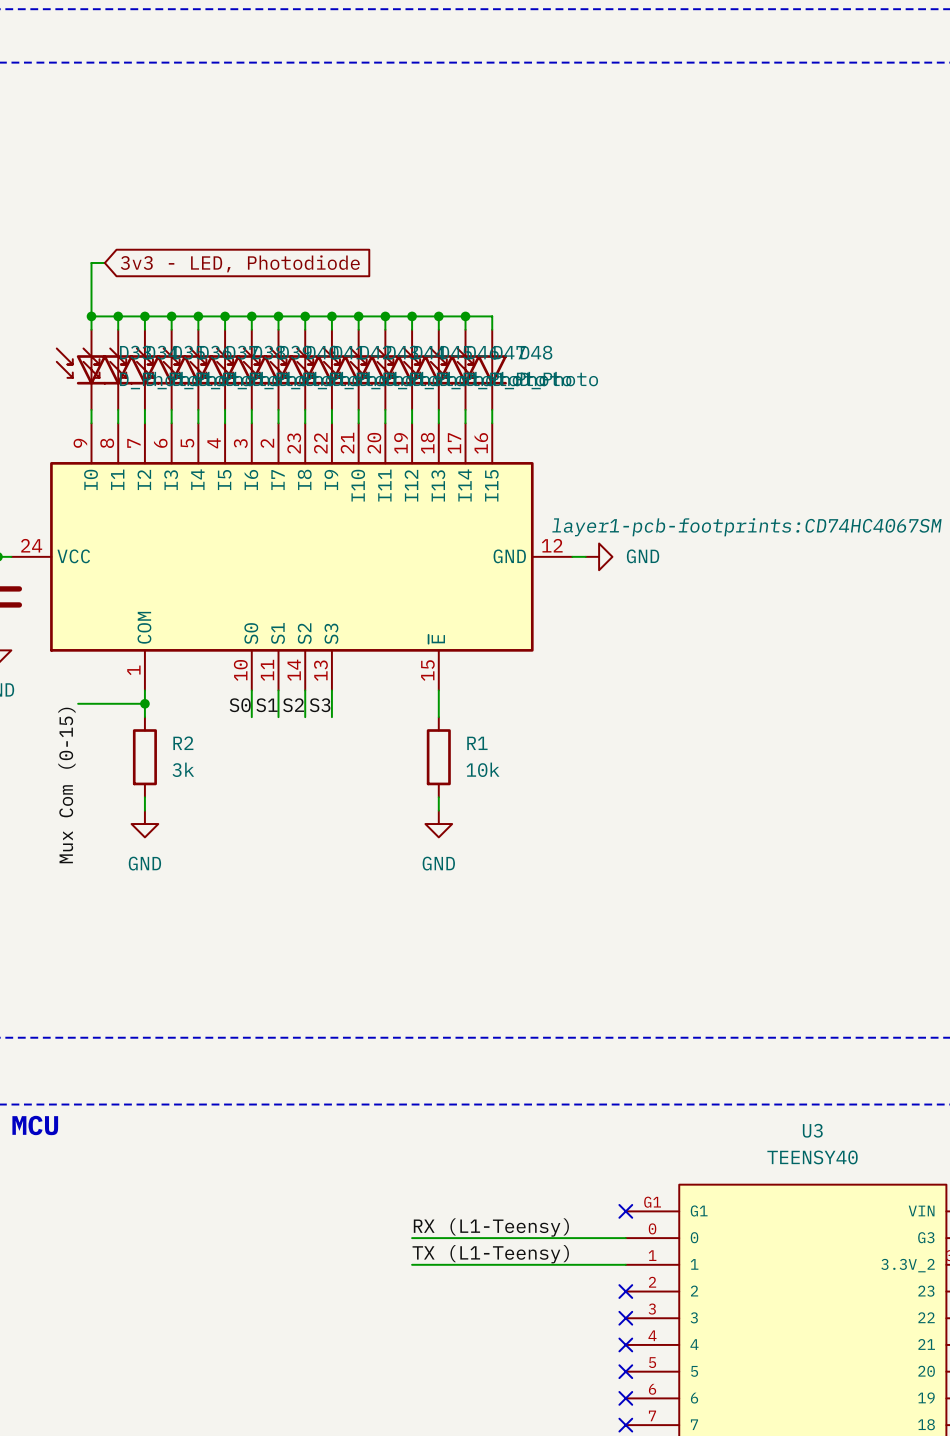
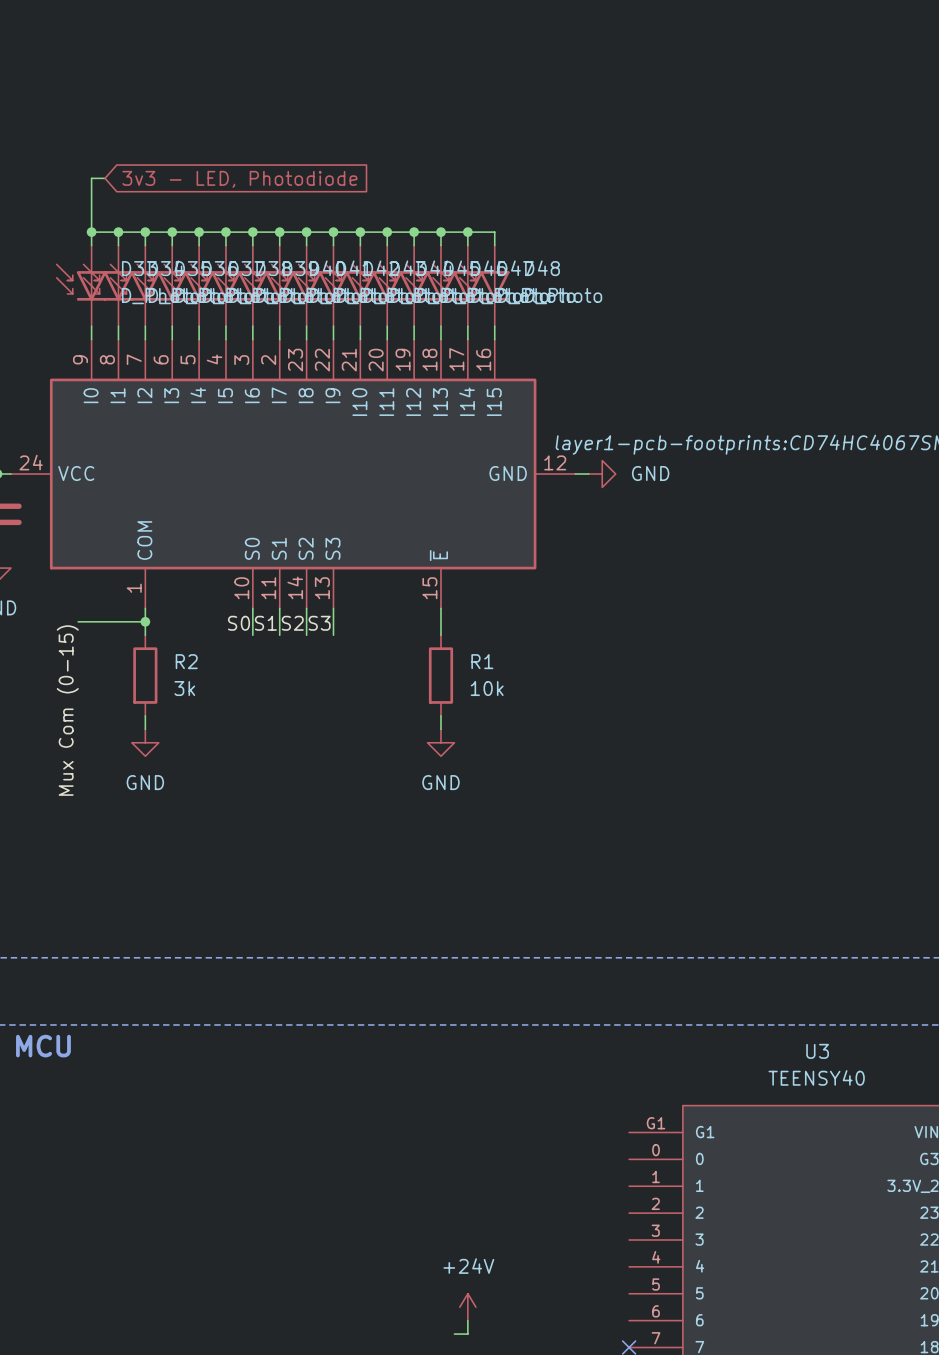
no-connect mark: (625, 1211) -> none
label: RX (L1-Teensy) (491, 1227) -> none
wire: (412, 1238) (625, 1238) -> none
label: TX (L1-Teensy) (490, 1254) -> none
wire: (412, 1264) (625, 1264) -> none
no-connect mark: (625, 1291) -> none
no-connect mark: (625, 1318) -> none
no-connect mark: (625, 1344) -> none
no-connect mark: (625, 1371) -> none
power symbol: none -> +24V (467, 1307)
wire: none -> (467, 1320) (467, 1334) (454, 1334)
no-connect mark: (625, 1398) -> none

